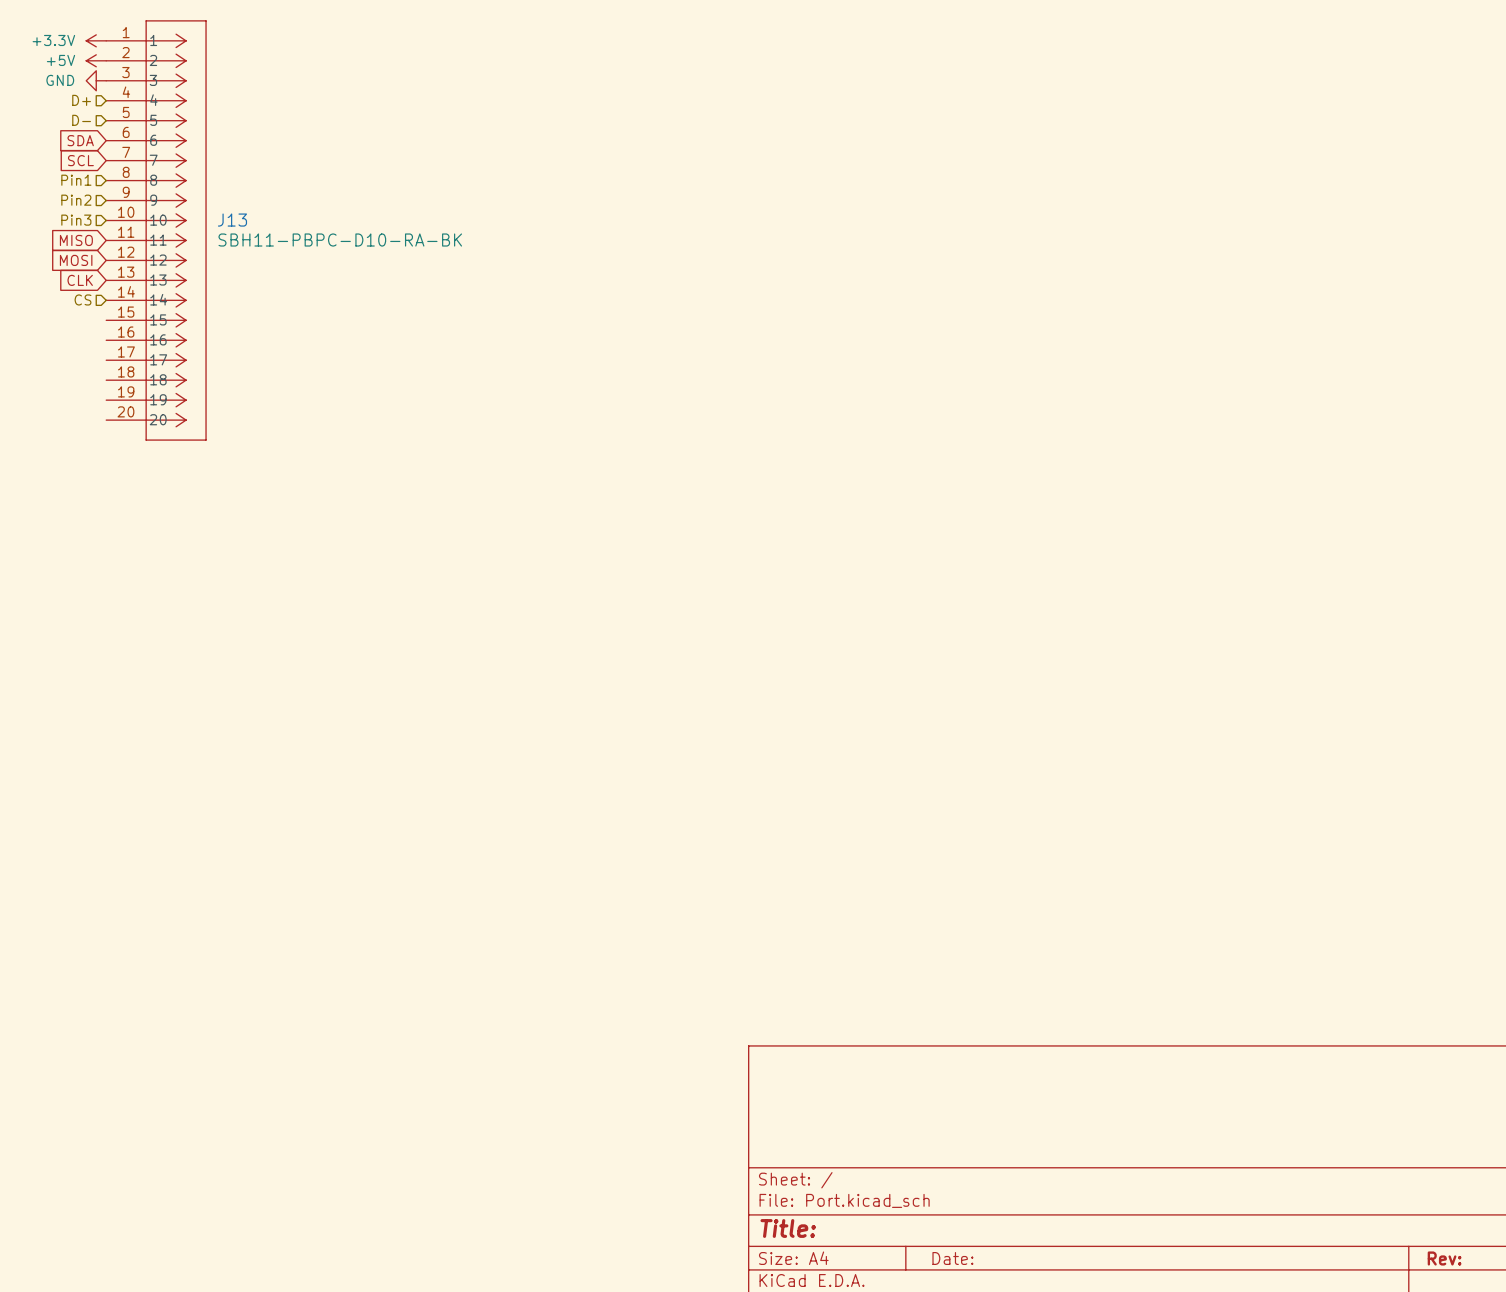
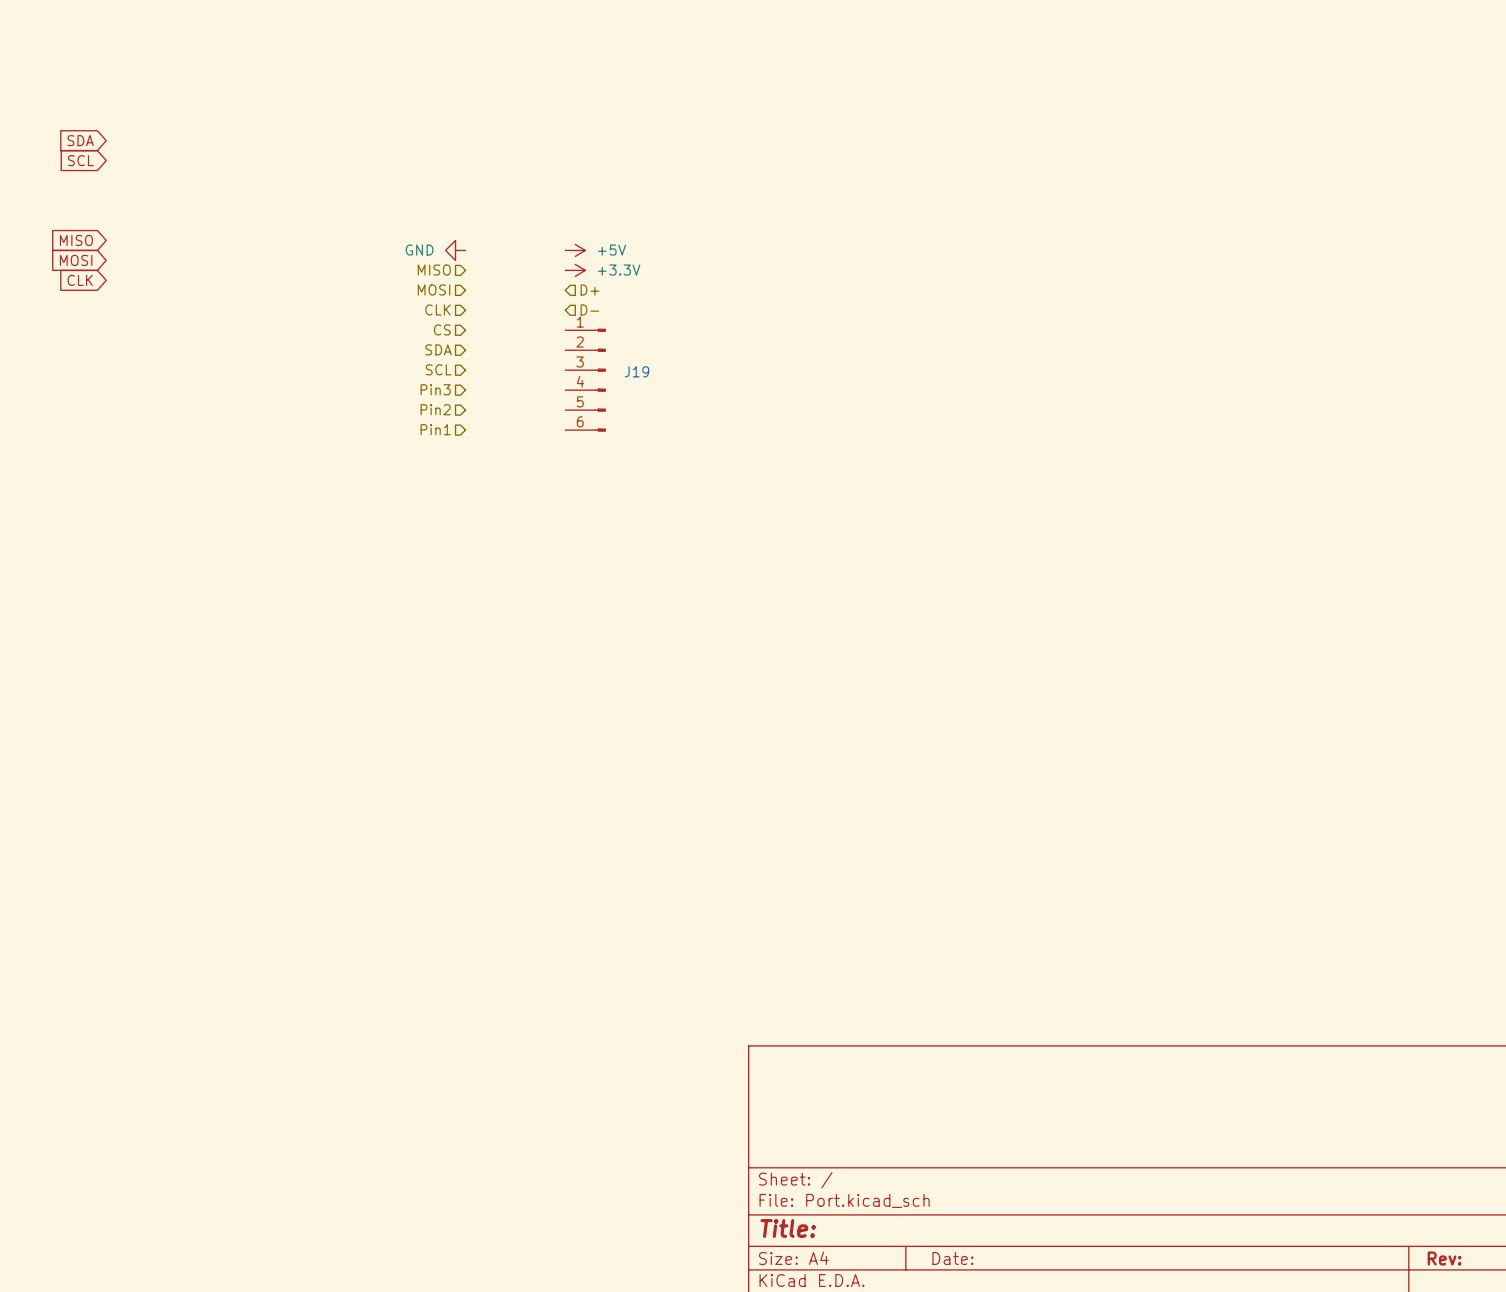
power symbol: +3.3V (96, 40) -> none
power symbol: +5V (96, 60) -> none
power symbol: GND (96, 80) -> none
hierarchical label: D+ (81, 100) -> none
hierarchical label: D- (81, 120) -> none
hierarchical label: Pin1 (76, 180) -> none
hierarchical label: Pin2 (76, 200) -> none
hierarchical label: Pin3 (76, 220) -> none
J13: SBH11-PBPC-D10-RA-BK (156, 230) -> none
power symbol: none -> GND (455, 250)
power symbol: none -> +5V (575, 250)
hierarchical label: none -> MISO (434, 270)
power symbol: none -> +3.3V (575, 270)
hierarchical label: none -> MOSI (434, 289)
hierarchical label: none -> D+ (589, 289)
hierarchical label: CS (83, 299) -> none
hierarchical label: none -> CLK (438, 309)
hierarchical label: none -> D- (589, 309)
hierarchical label: none -> CS (442, 329)
hierarchical label: none -> SDA (438, 349)
hierarchical label: none -> SCL (438, 369)
J19: none -> (585, 380)
hierarchical label: none -> Pin3 (435, 389)
hierarchical label: none -> Pin2 (435, 409)
hierarchical label: none -> Pin1 (435, 429)

